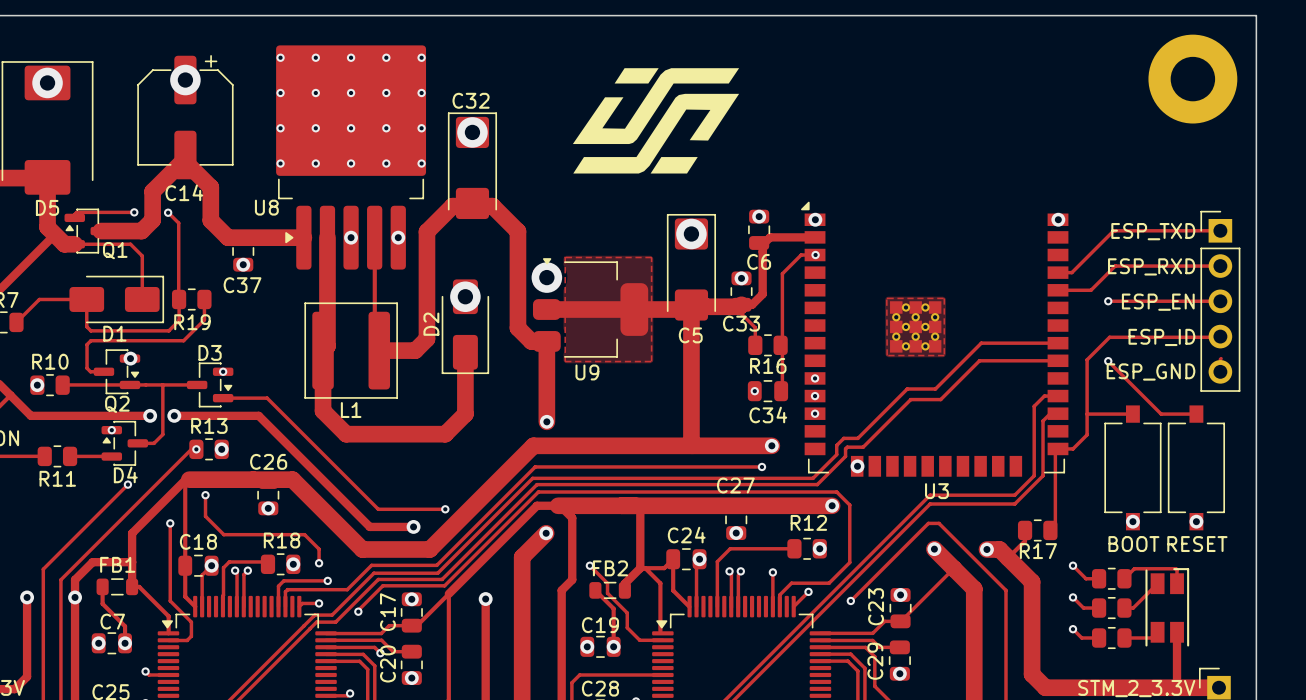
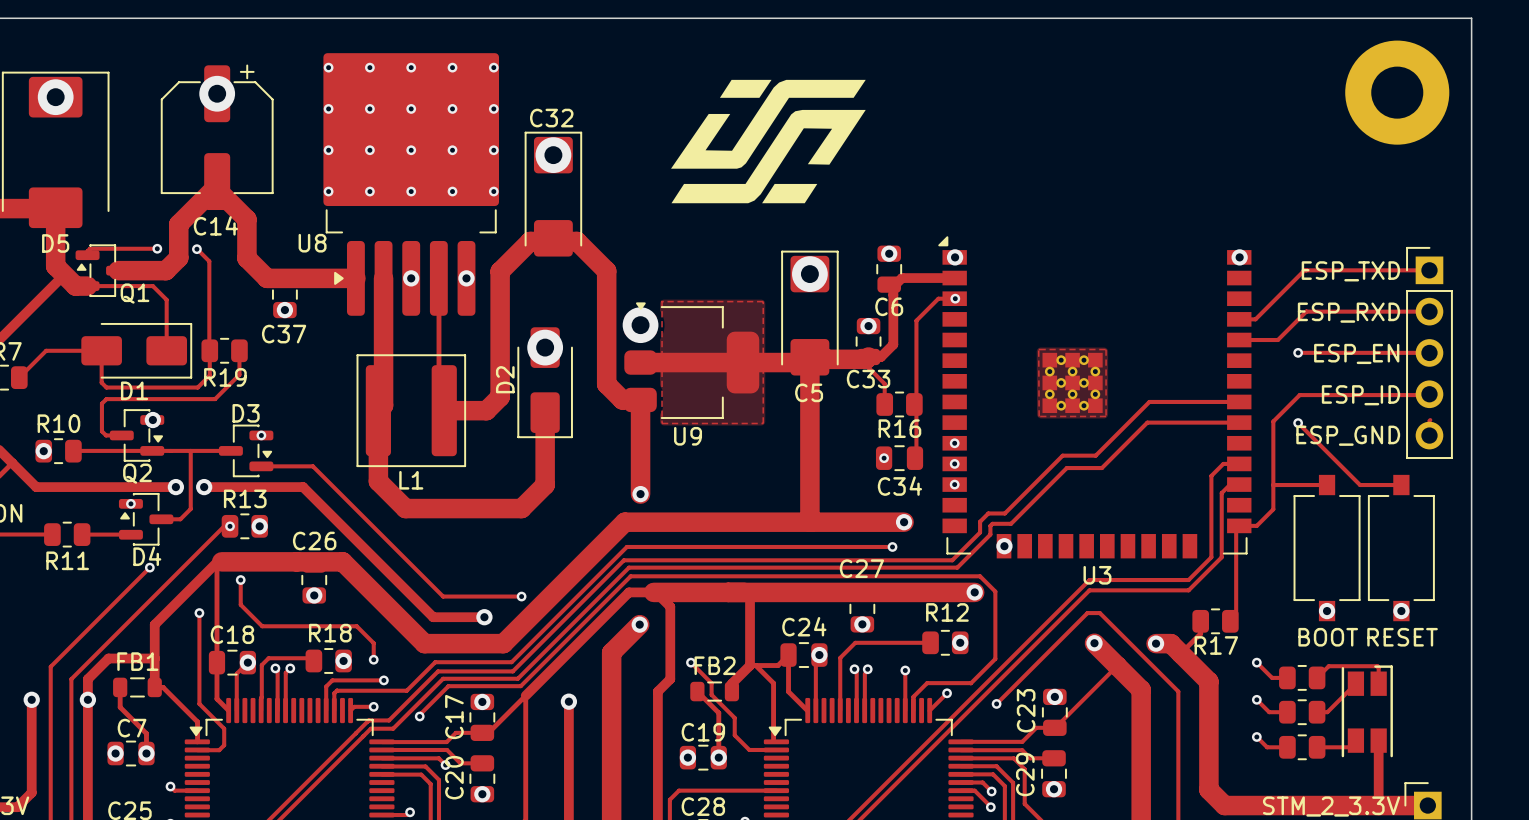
track: none -> (960, 782) (982, 782) (990, 790)
track: none -> (960, 790) (974, 790) (990, 806)
via: none -> (991, 791)
via: none -> (990, 807)

